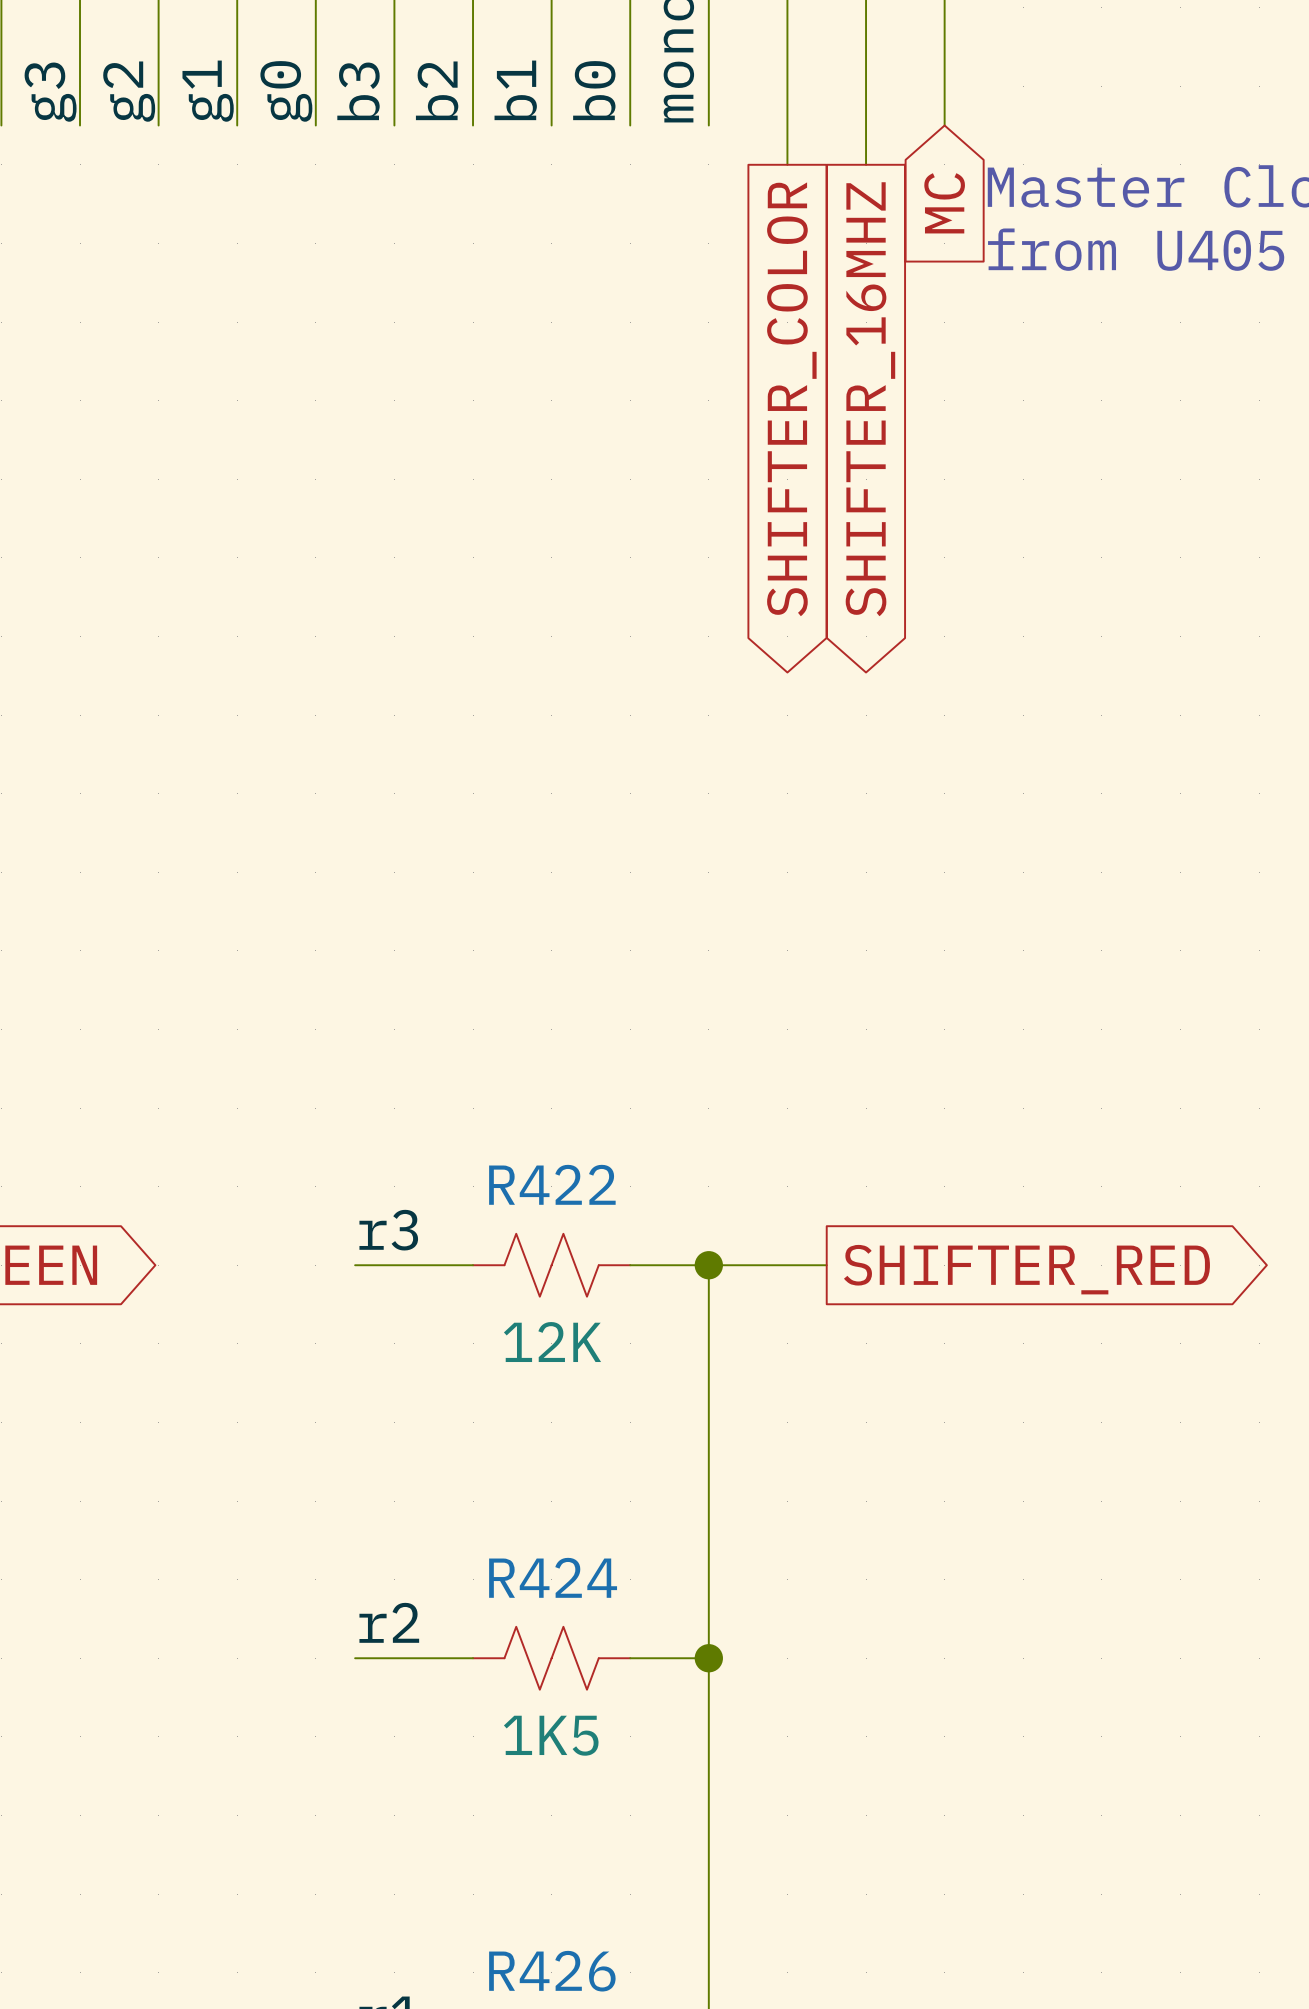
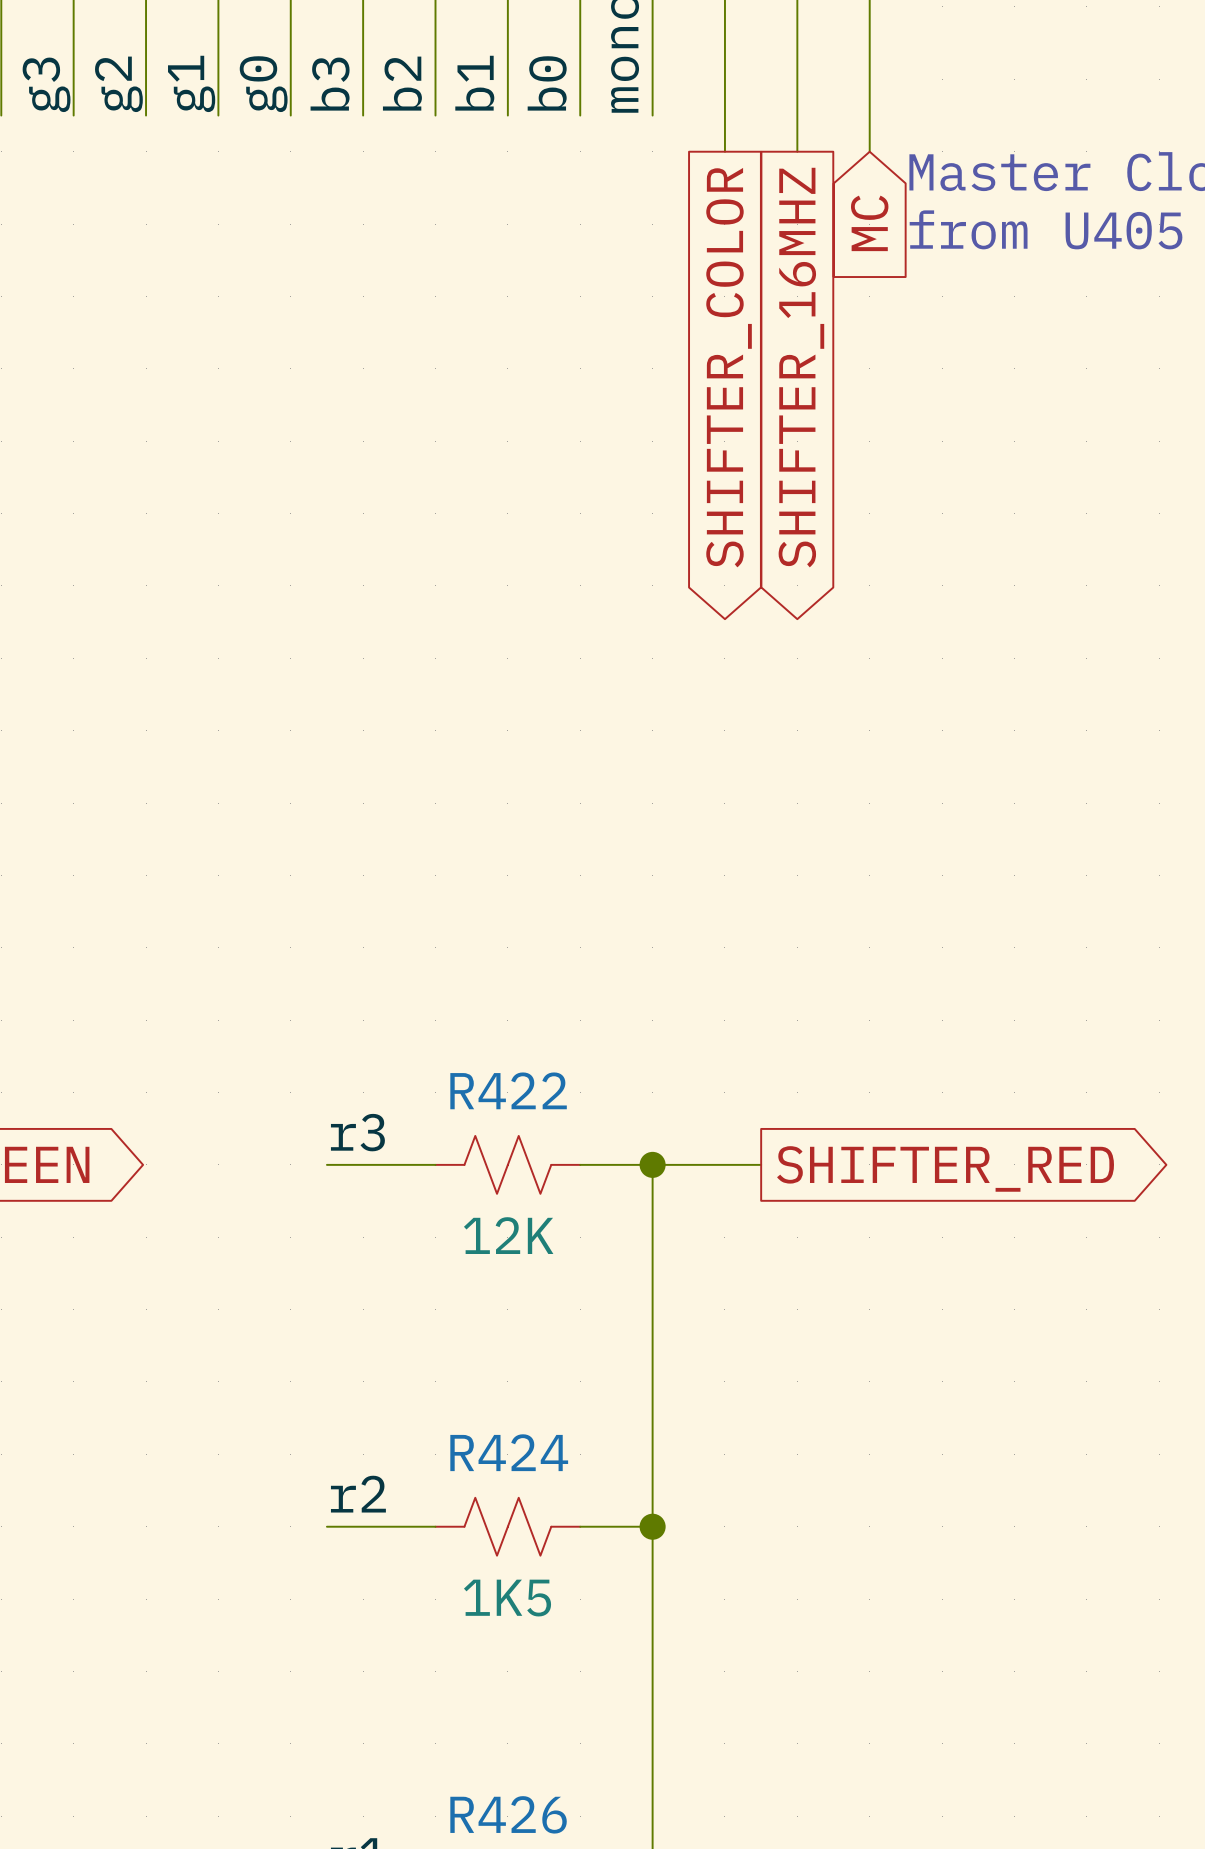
wire: none -> (869, 115) (869, 151)
global label position: MC (944, 203) -> MC (869, 223)

